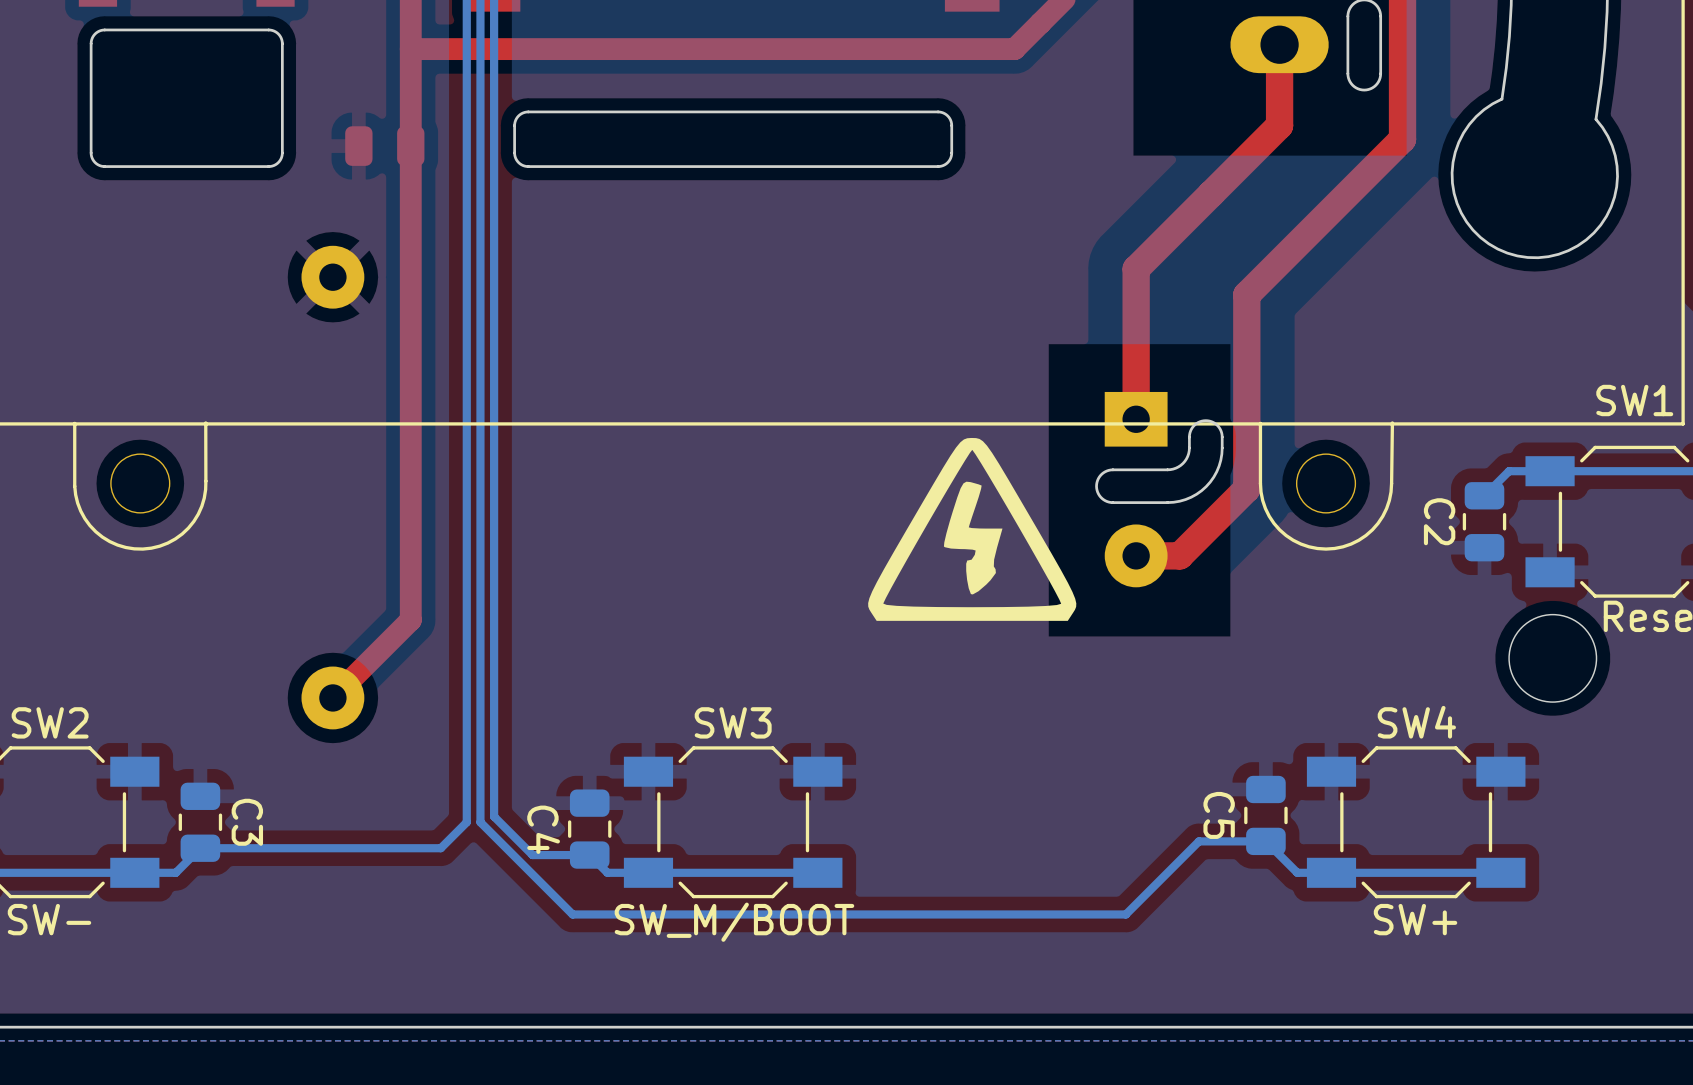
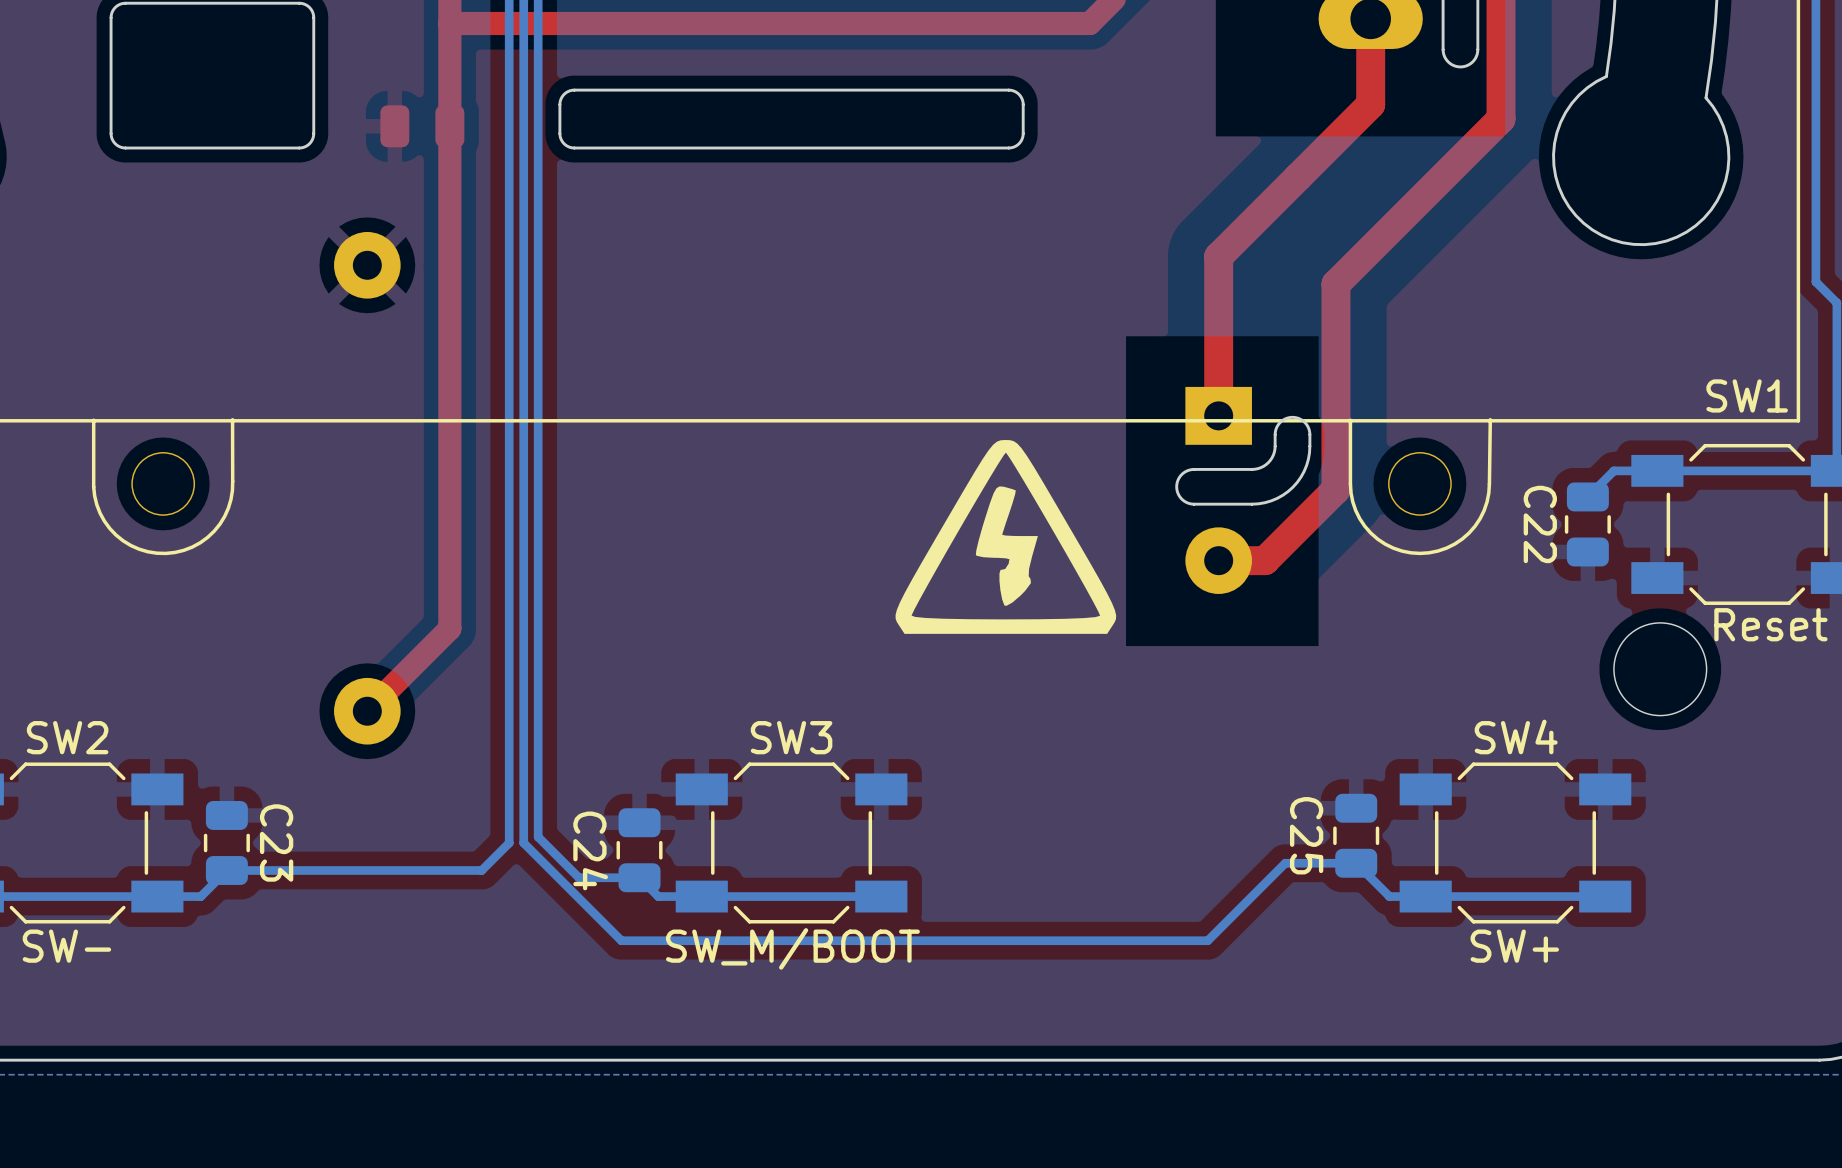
C2 name: C2 (1439, 521) -> C22 (1540, 524)
drawing position: (972, 529) -> (1005, 536)
C5 name: C5 (1219, 815) -> C25 (1306, 835)
C3 name: C3 (247, 822) -> C23 (276, 842)
C4 name: C4 (543, 829) -> C24 (590, 850)

